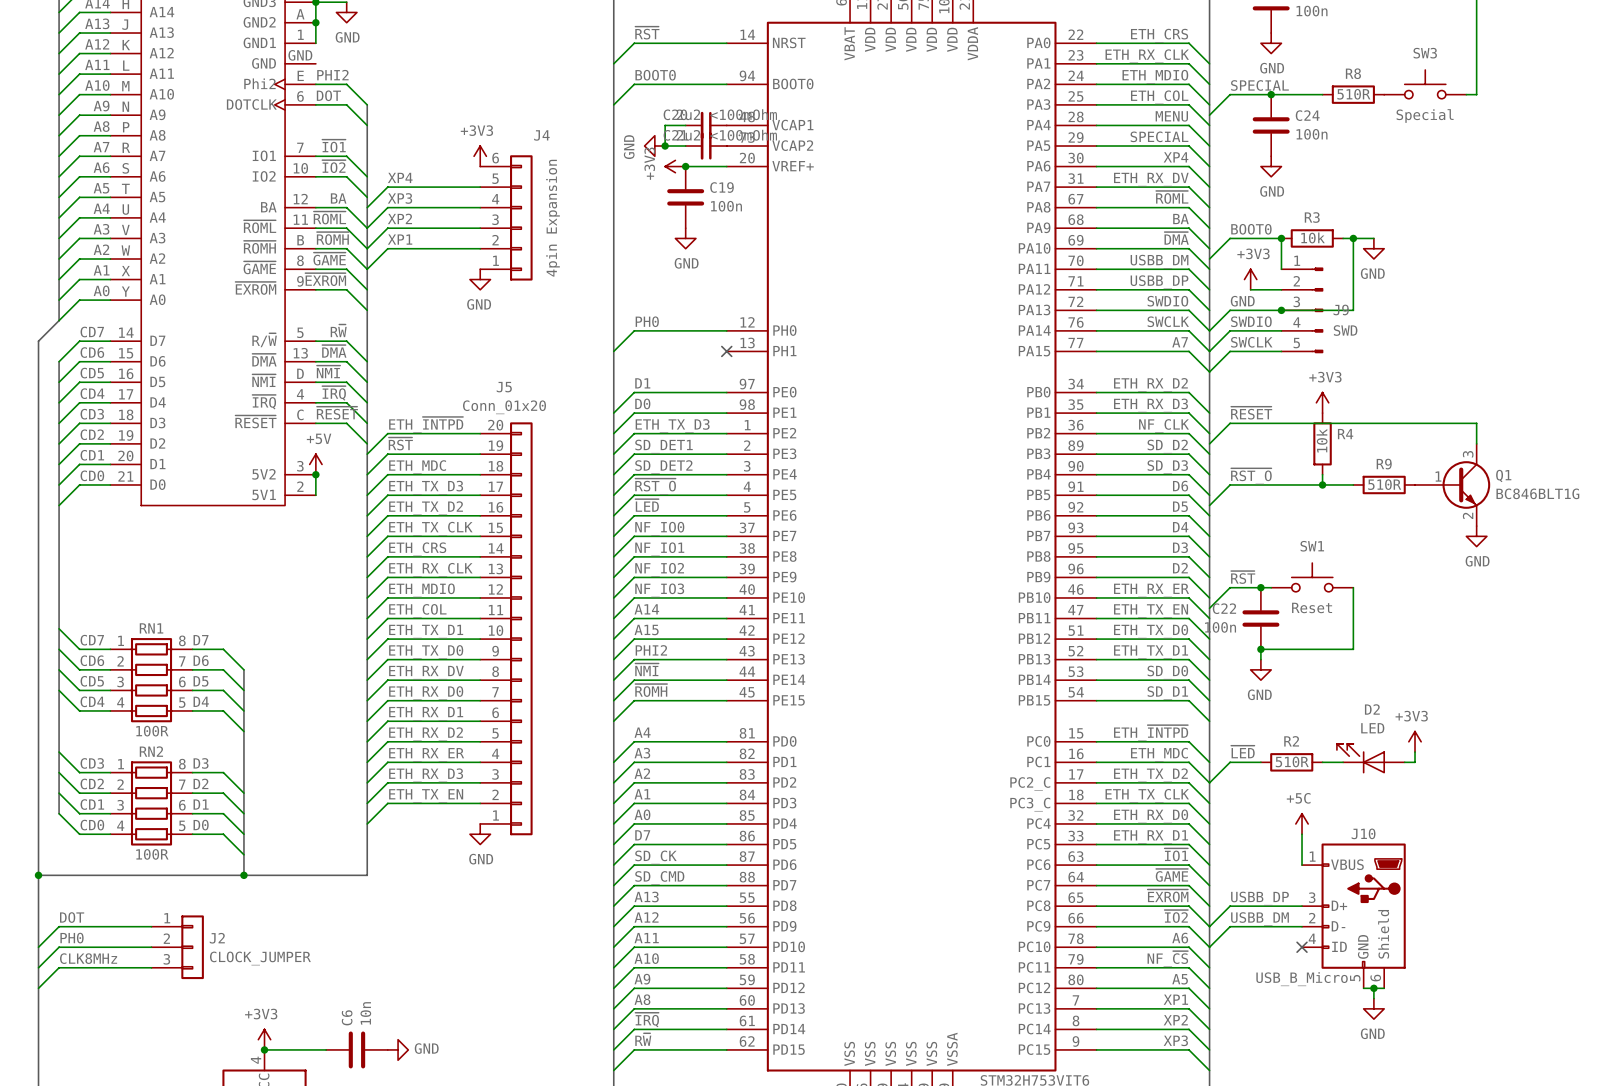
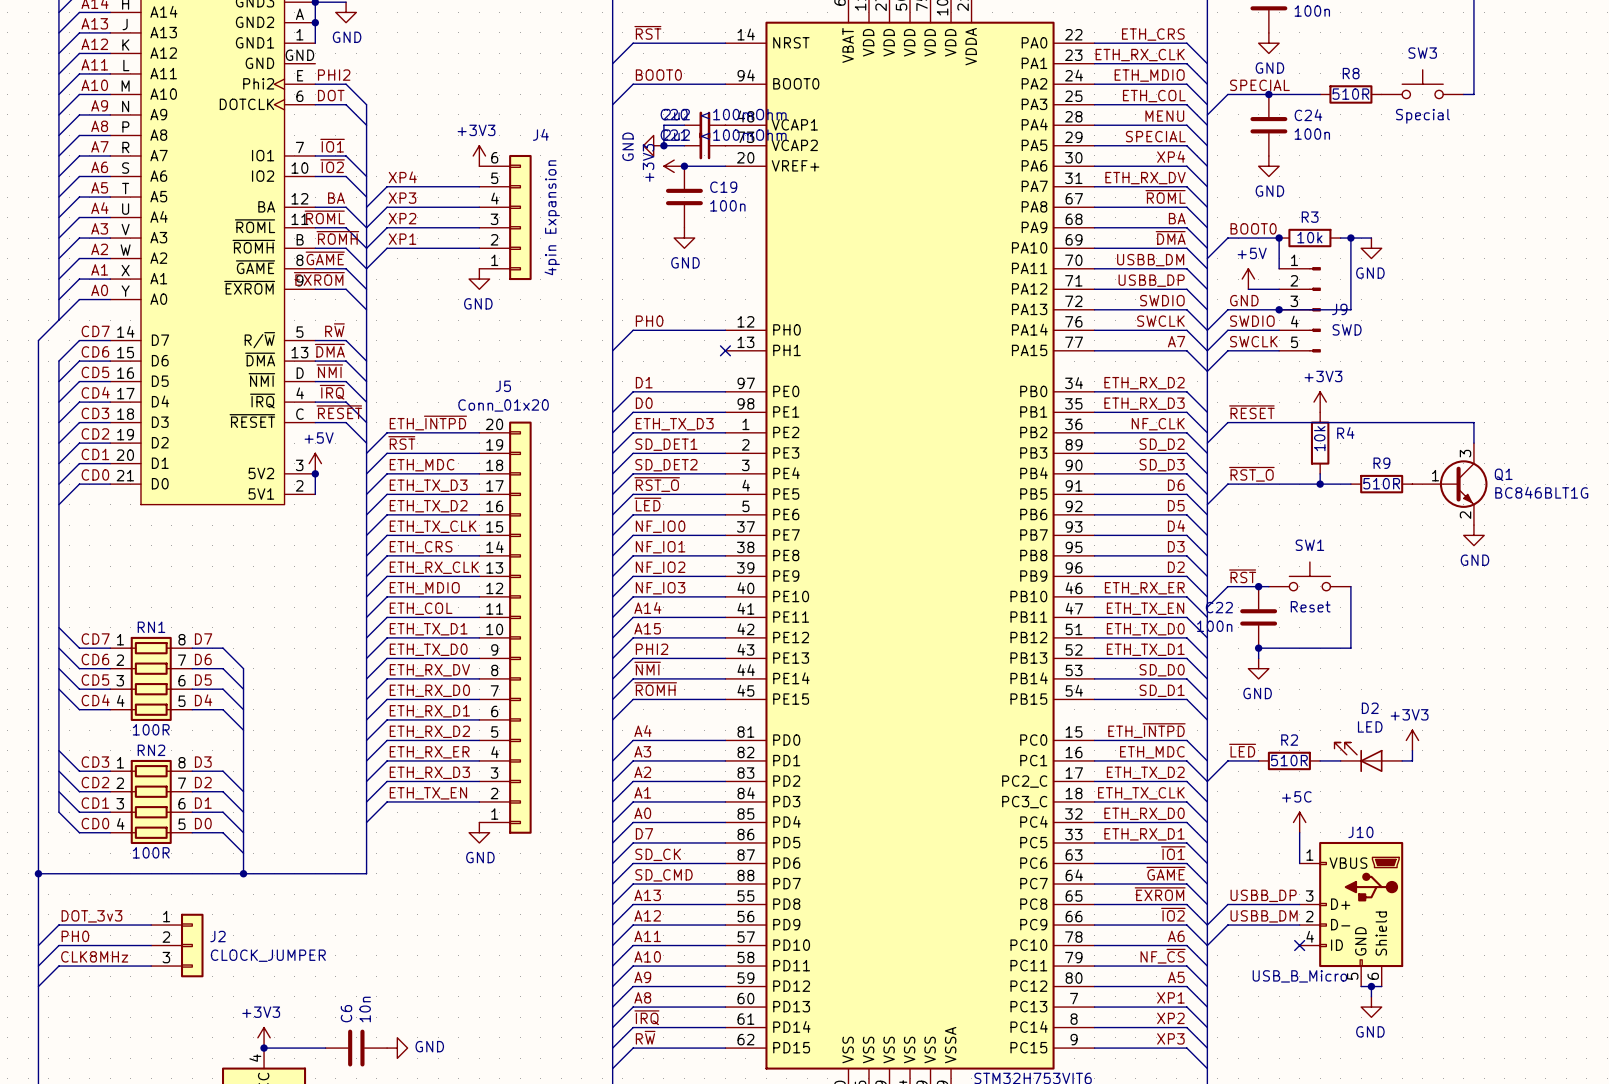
power symbol: +3V3 (1250, 279) -> +5V (1248, 279)
label: DOT (72, 917) -> DOT_3v3 (91, 916)

